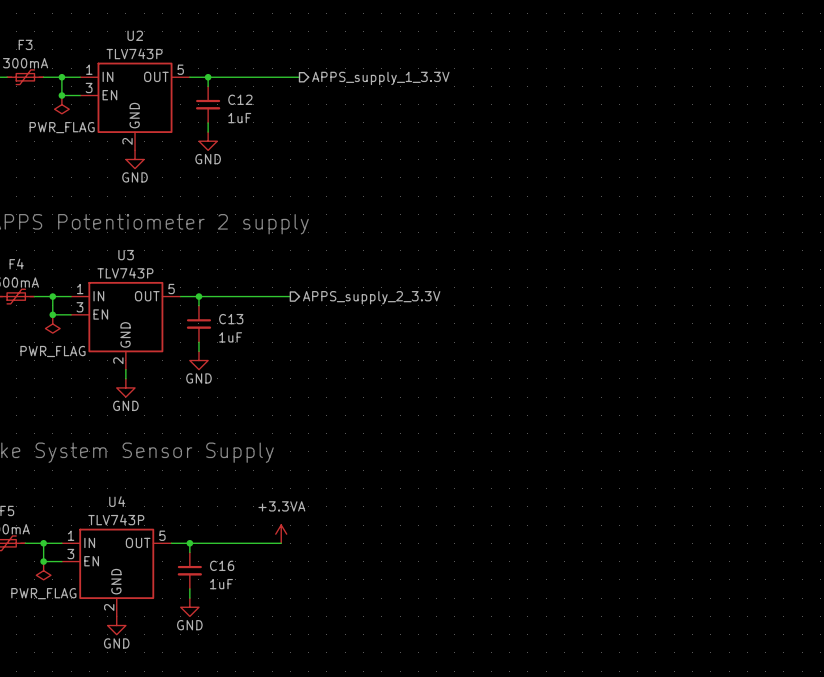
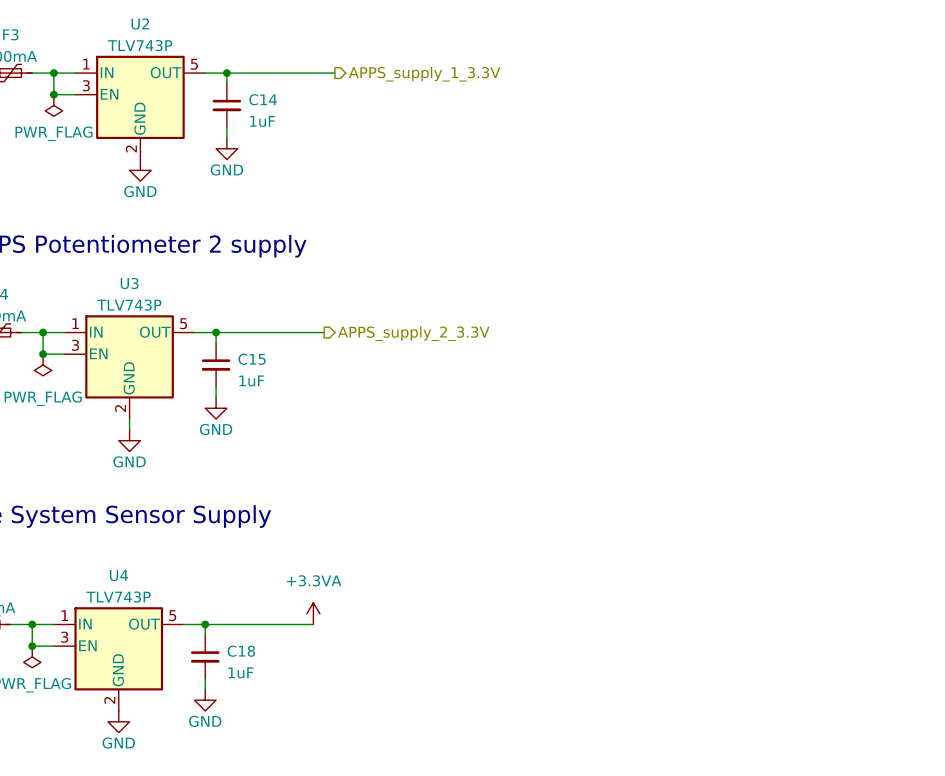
C12 name: C12 (240, 99) -> C14 (263, 99)
C13 name: C13 (231, 319) -> C15 (252, 359)
C16 name: C16 (222, 565) -> C18 (241, 651)

